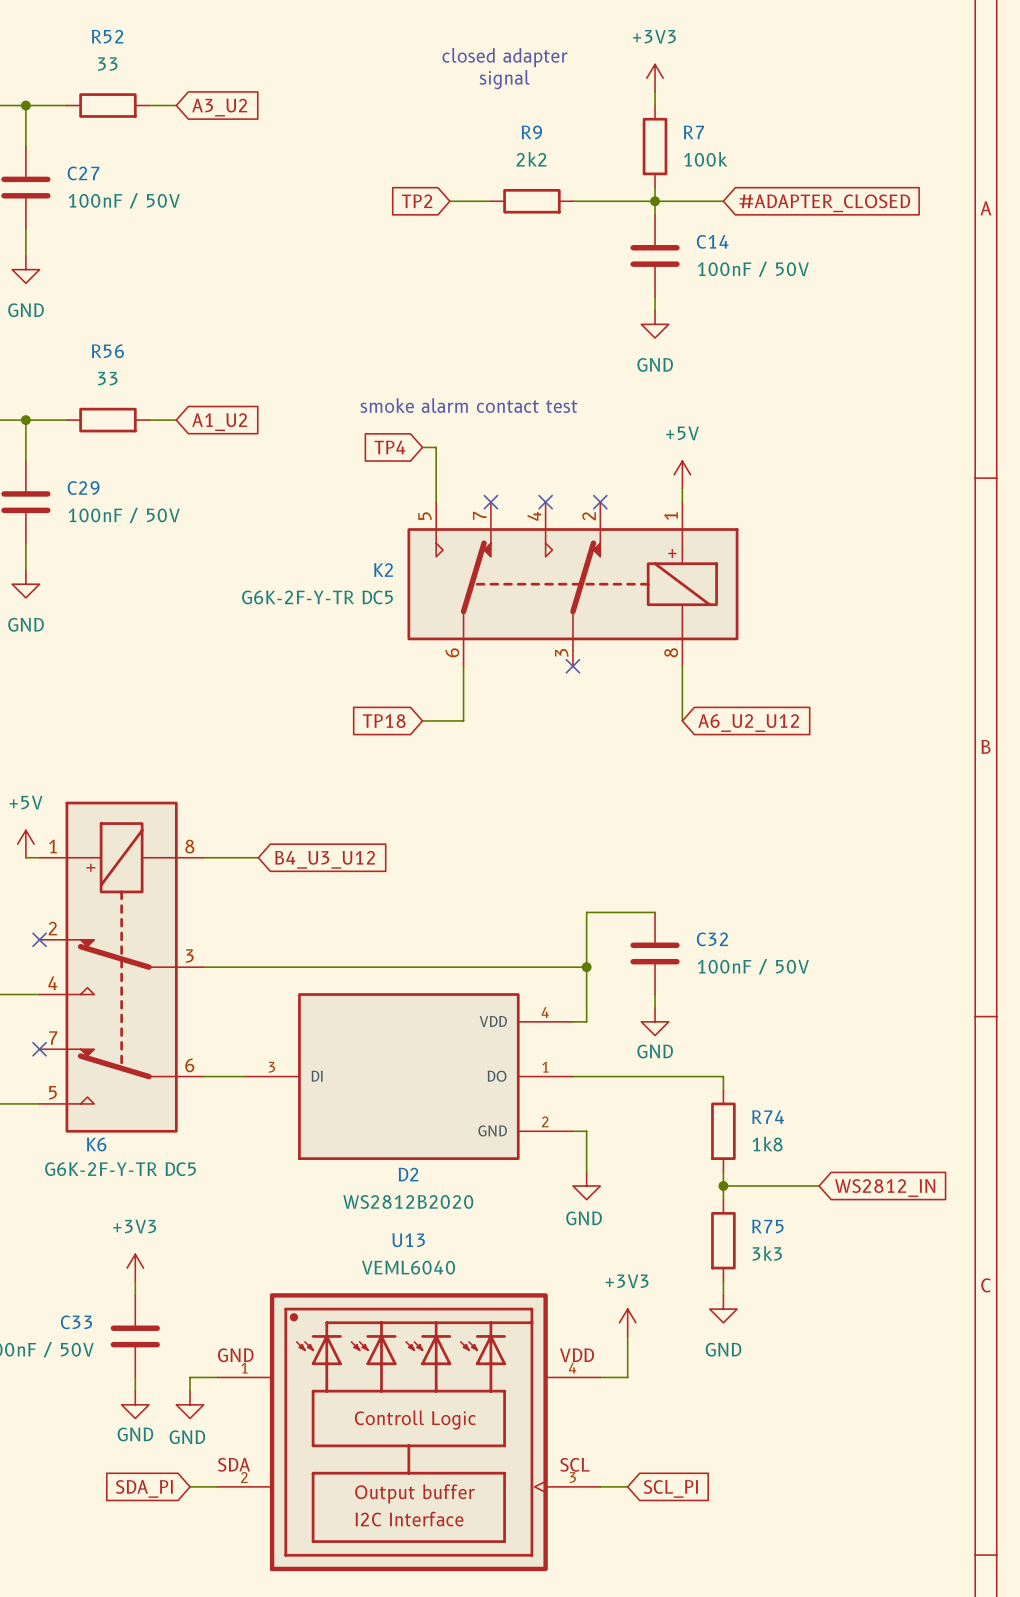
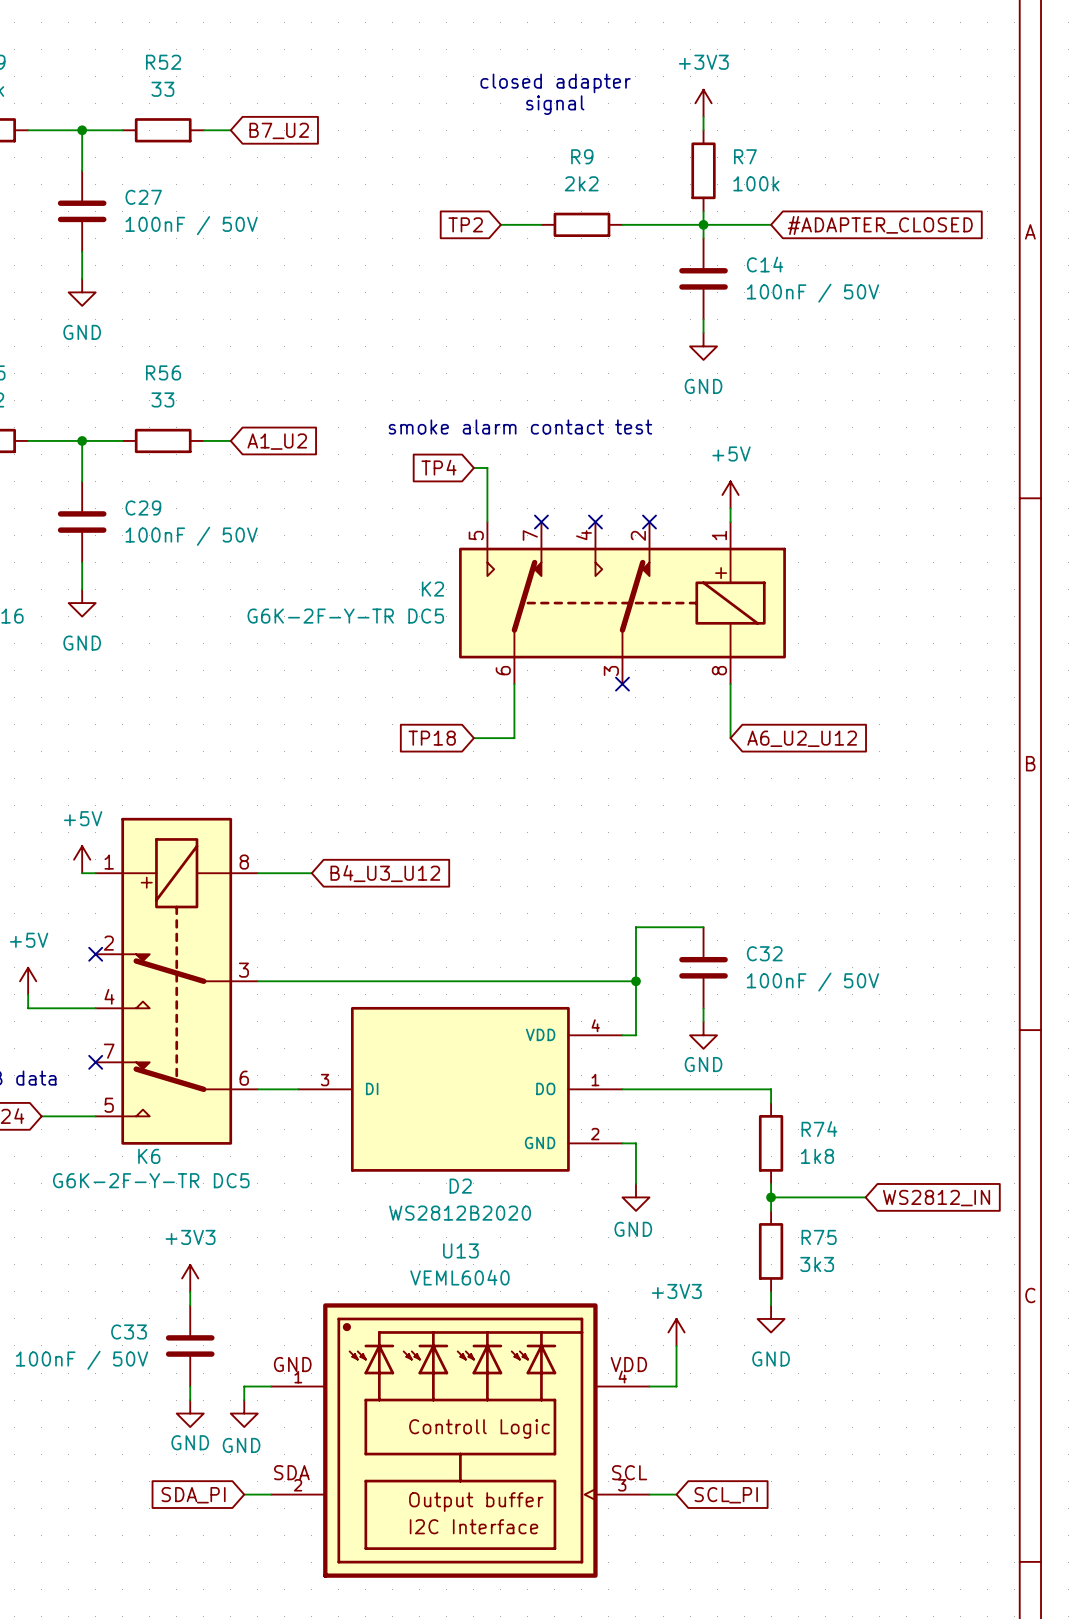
global label: A3_U2 (219, 107) -> B7_U2 (279, 130)

